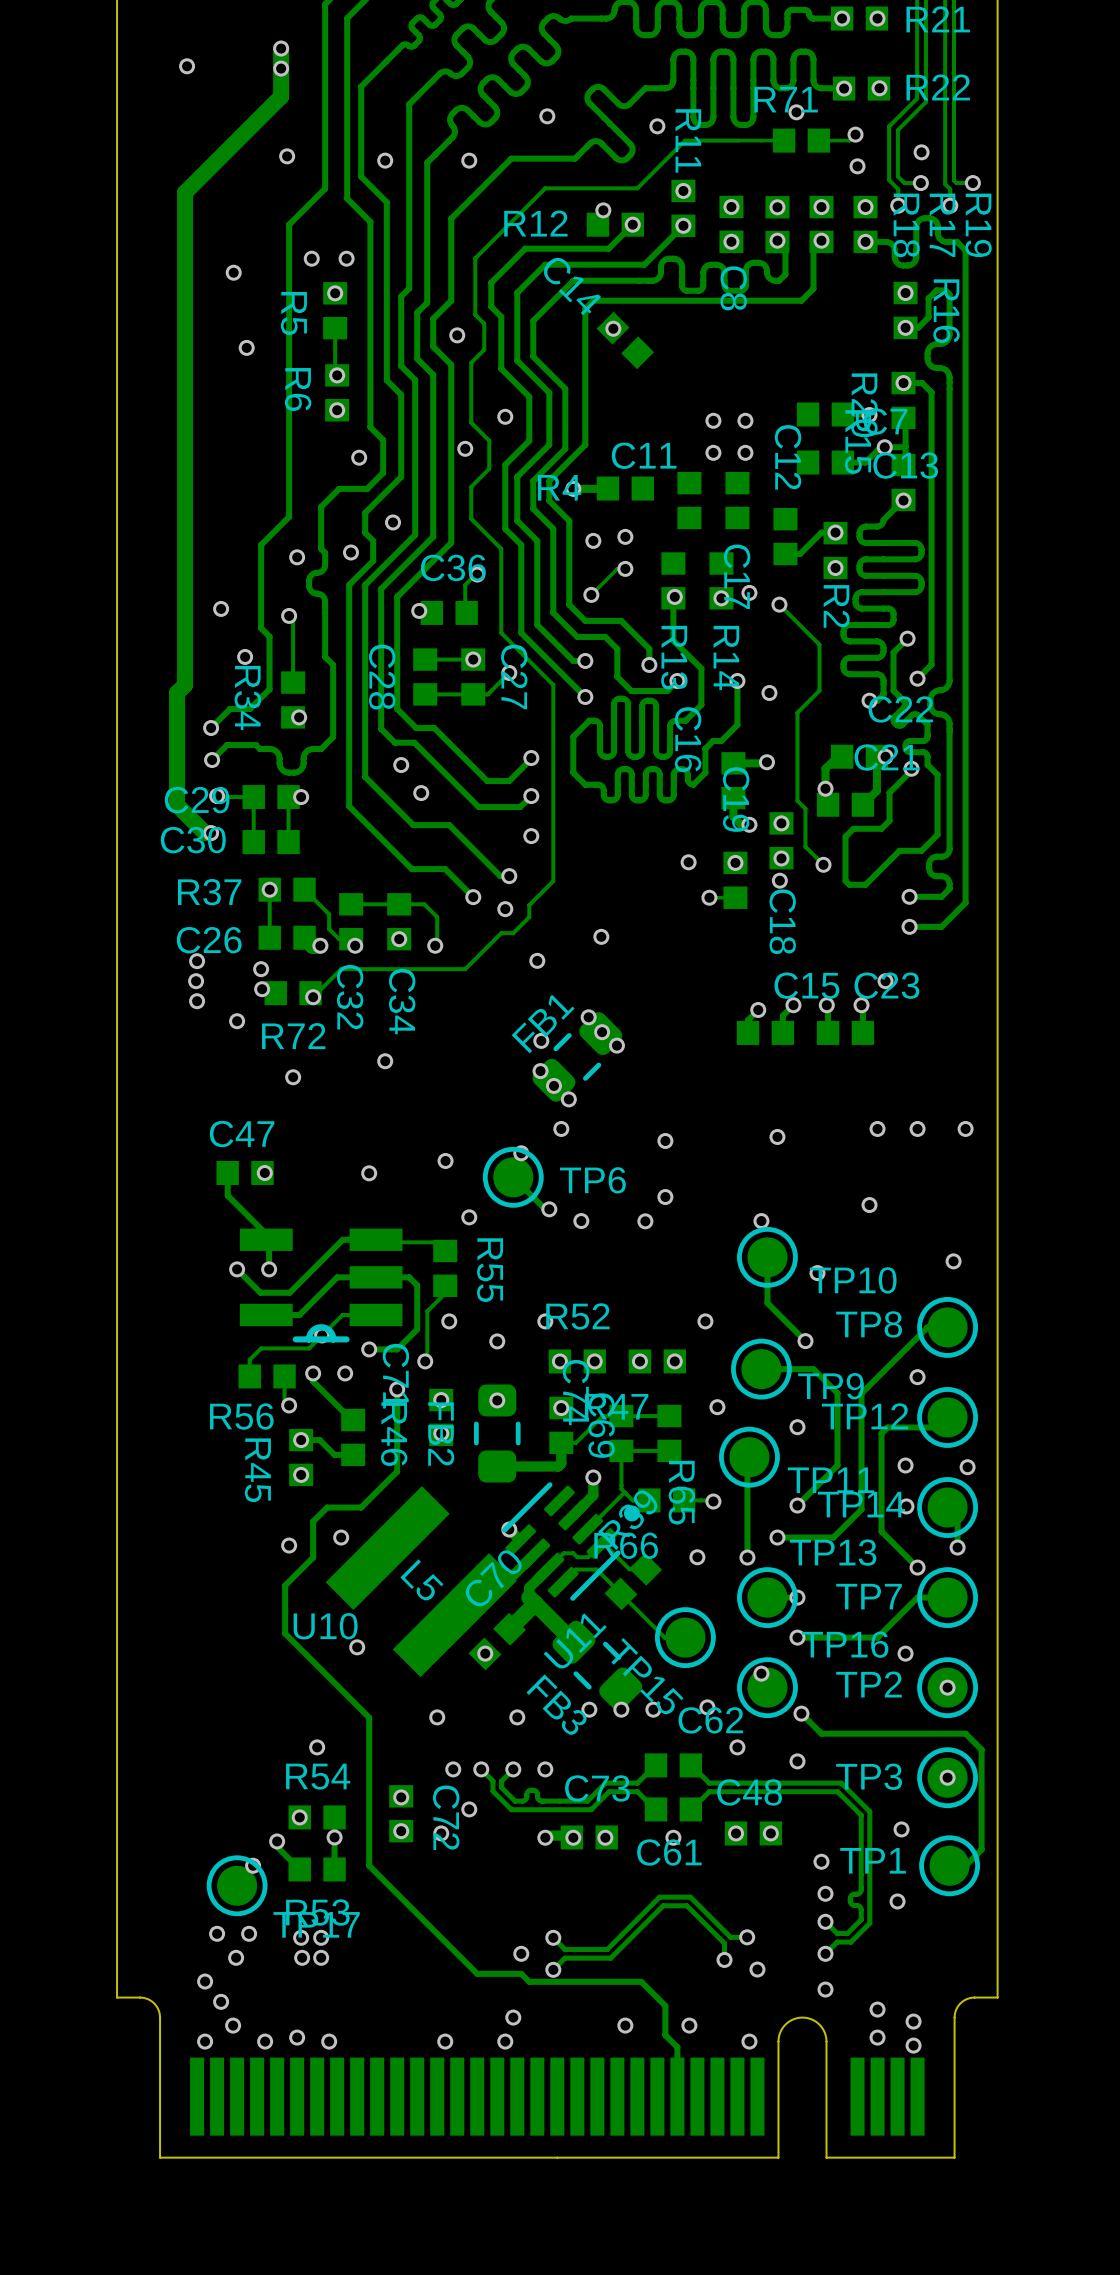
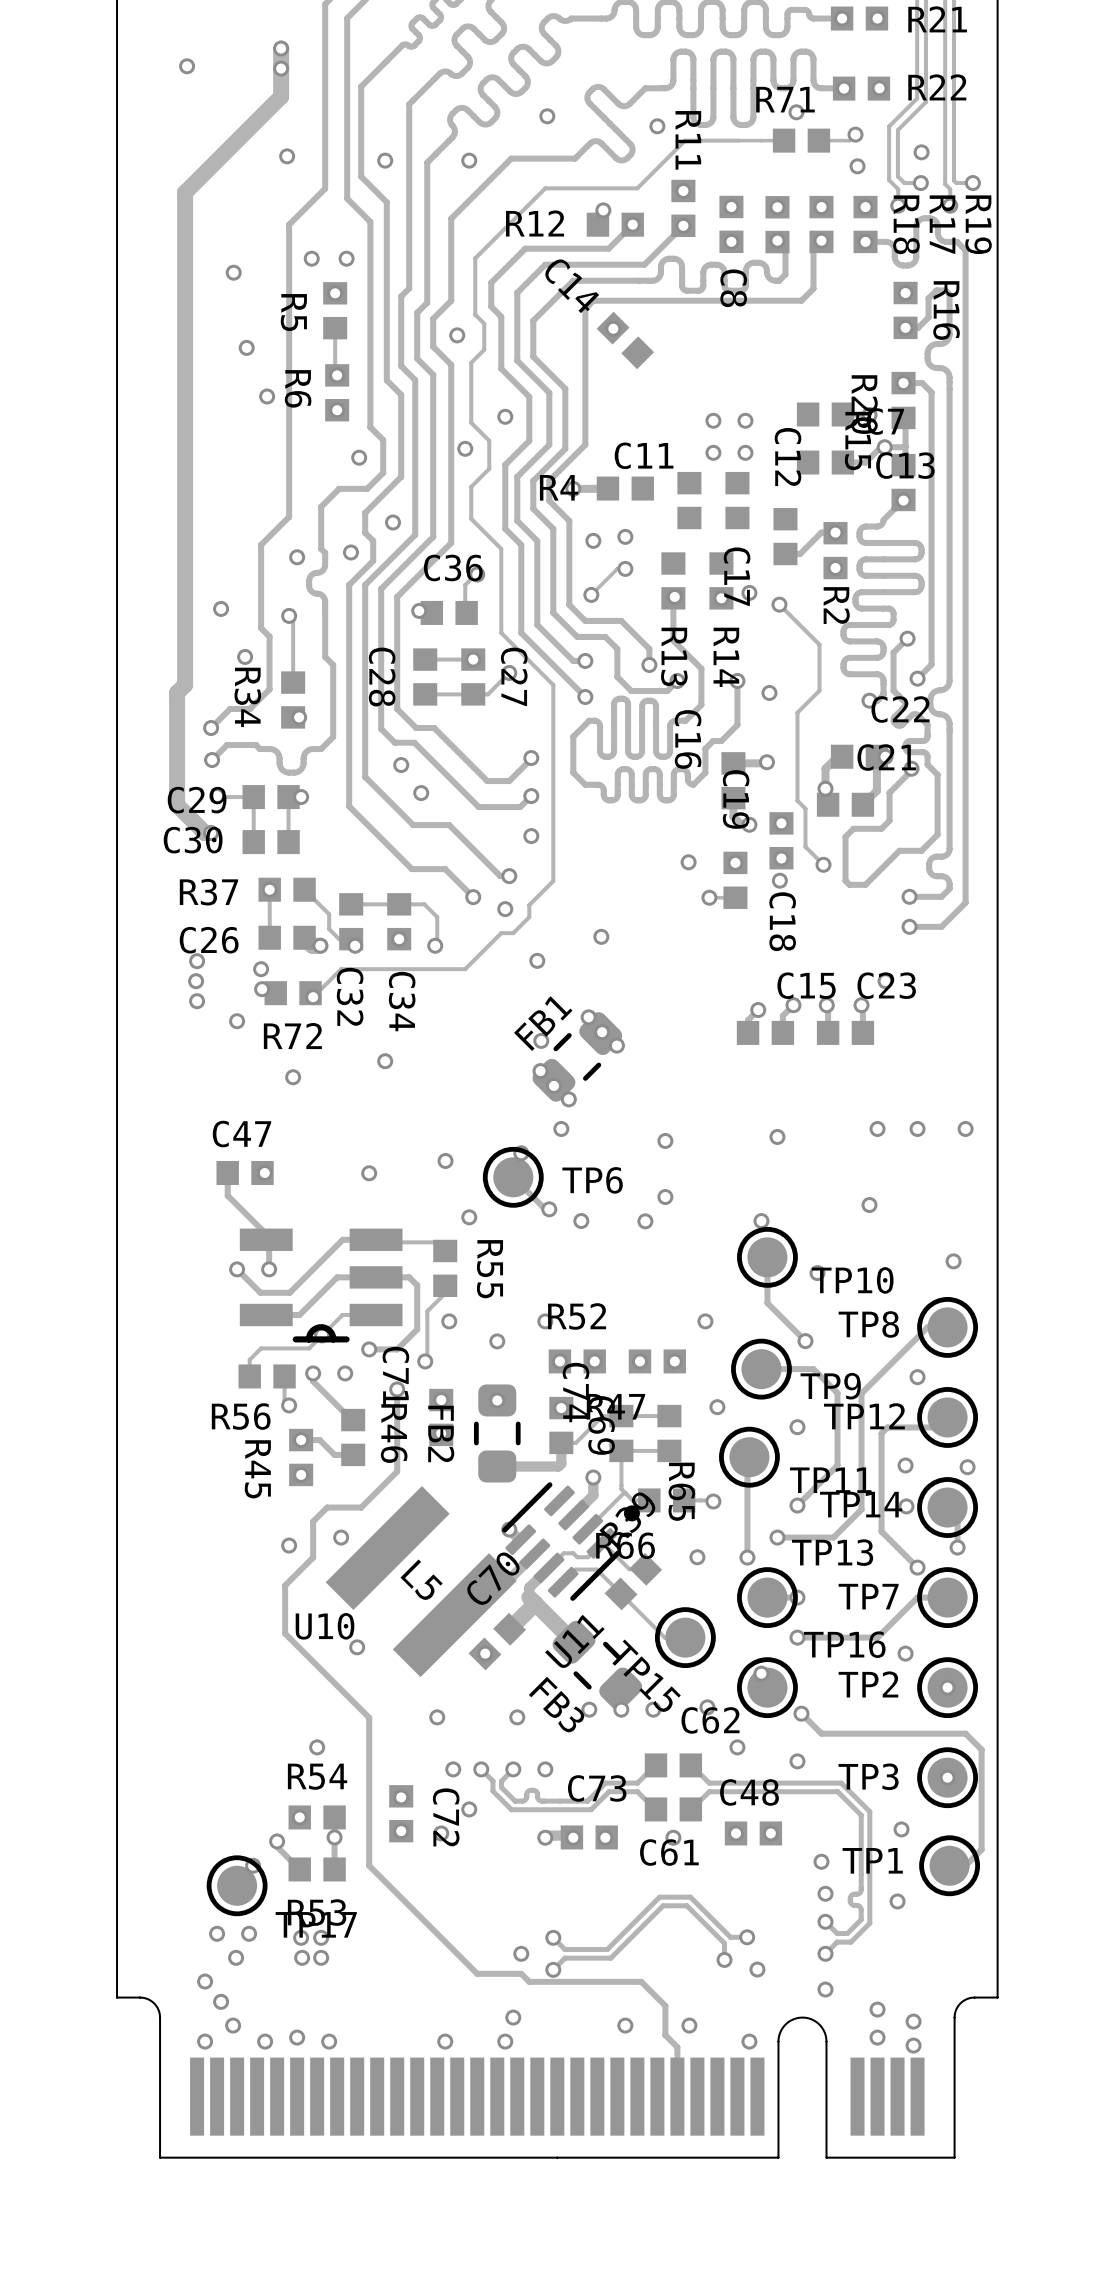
via: none -> (267, 396)

